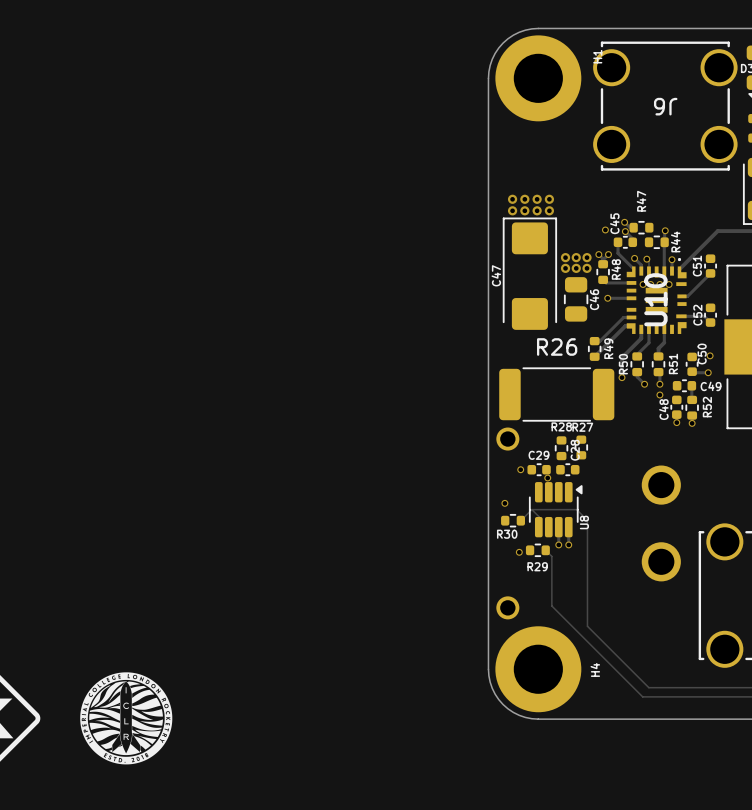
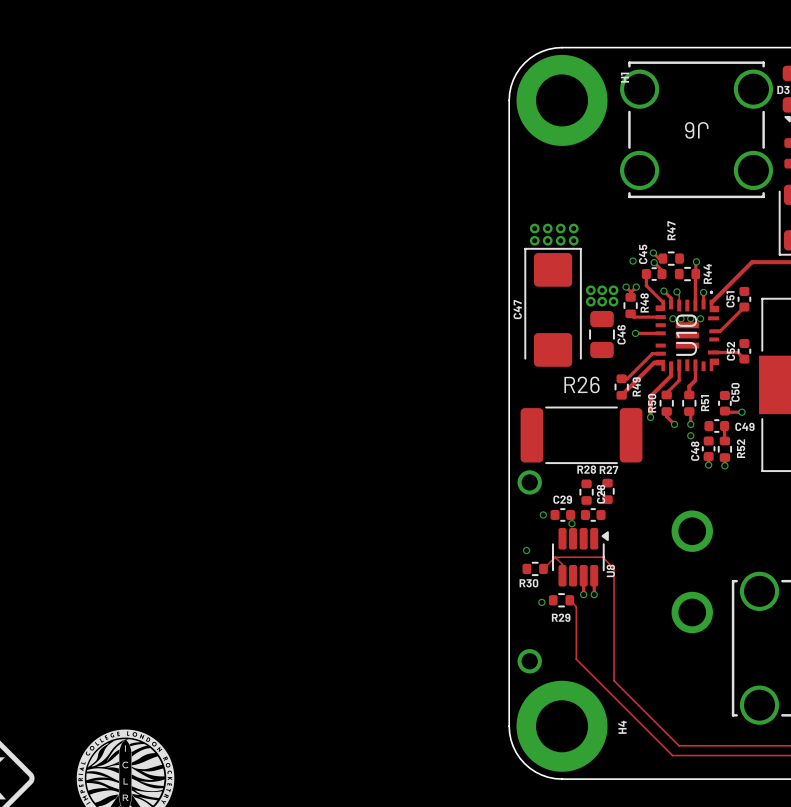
via: (710, 355) -> none

